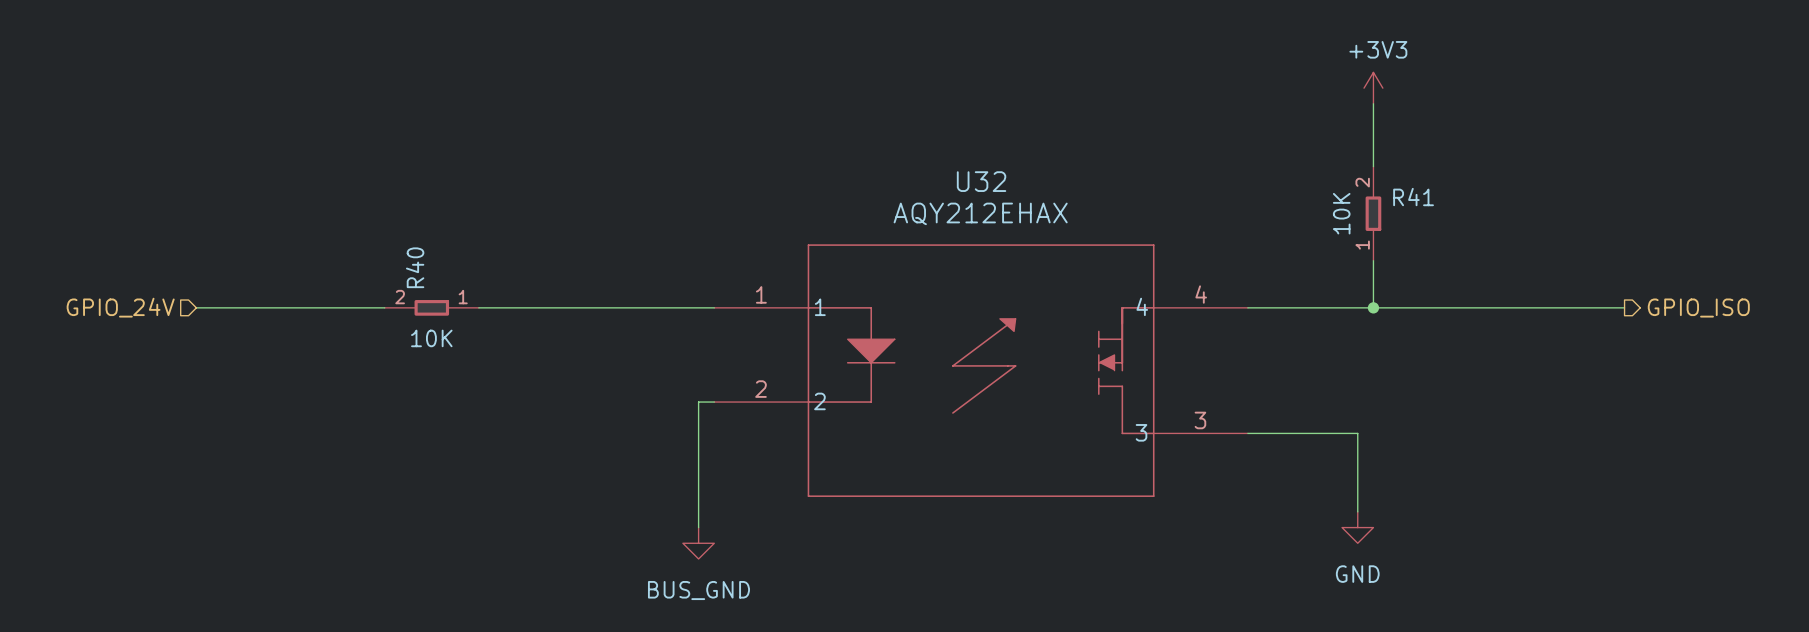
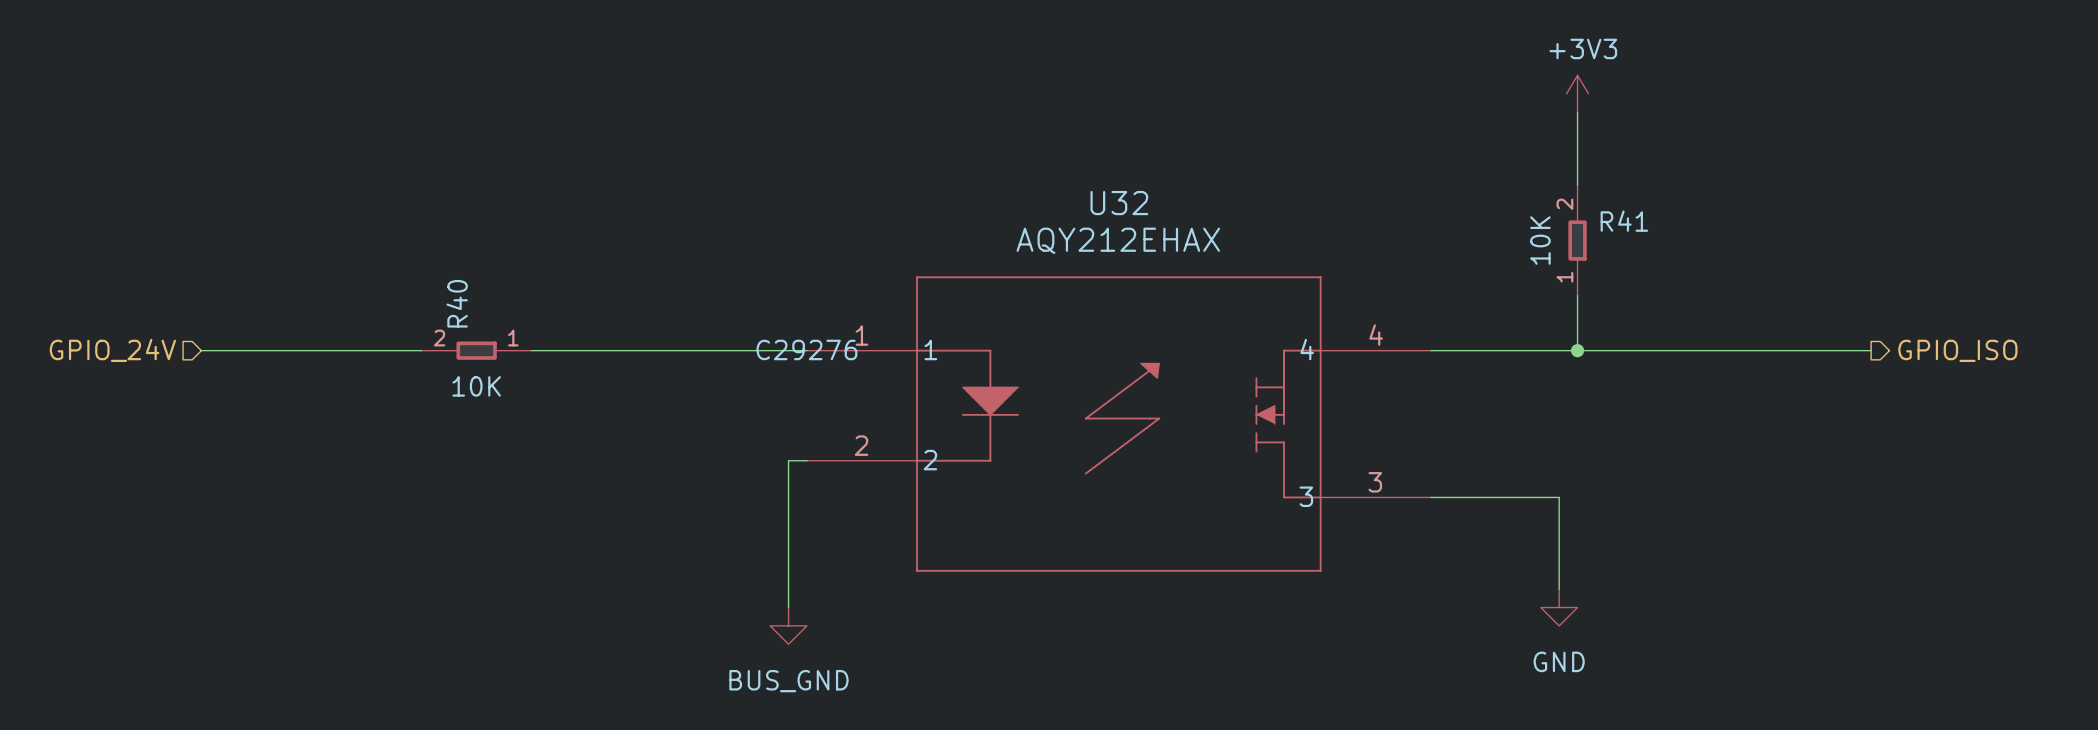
U32 text: none -> C29276 (806, 349)

